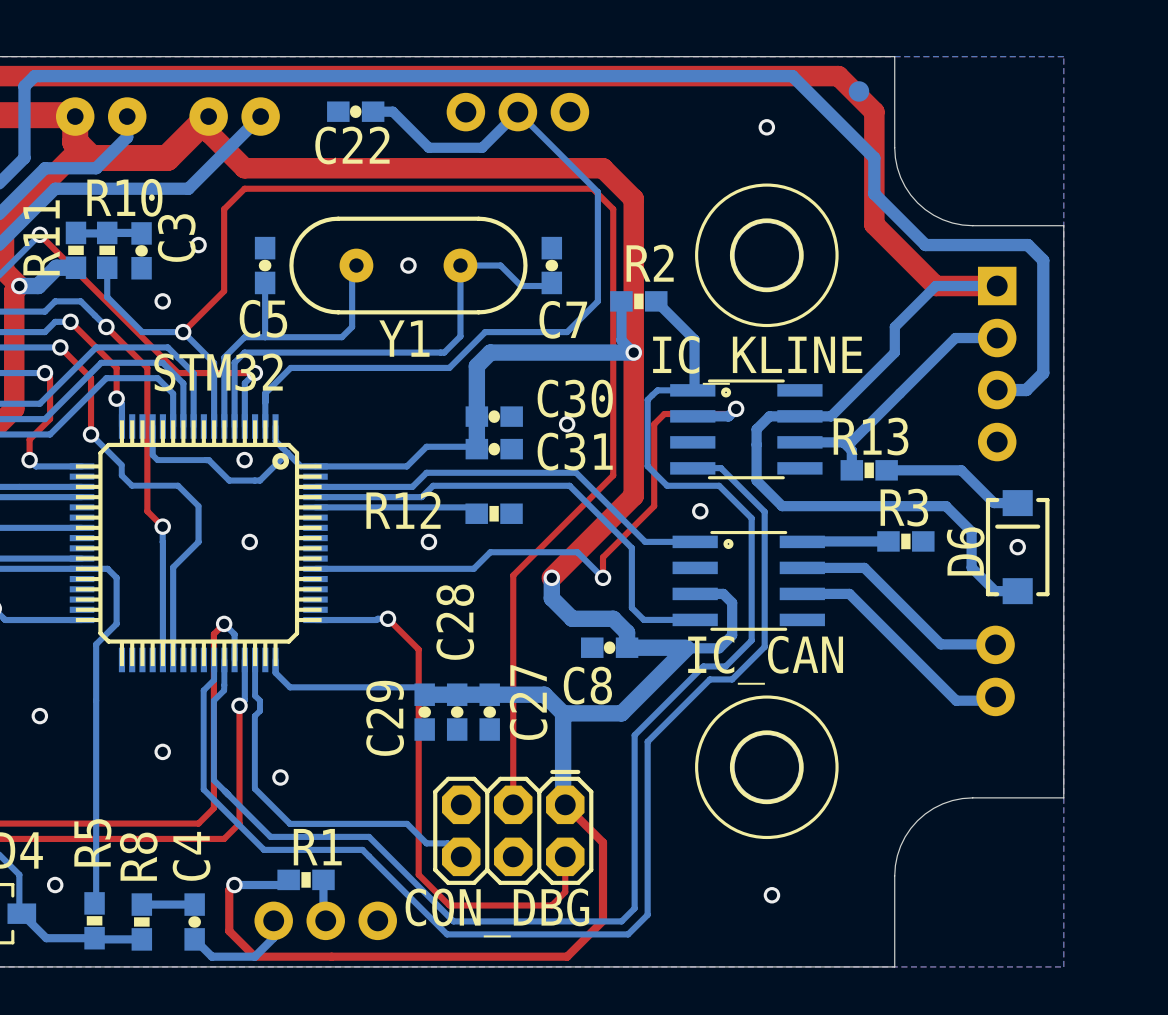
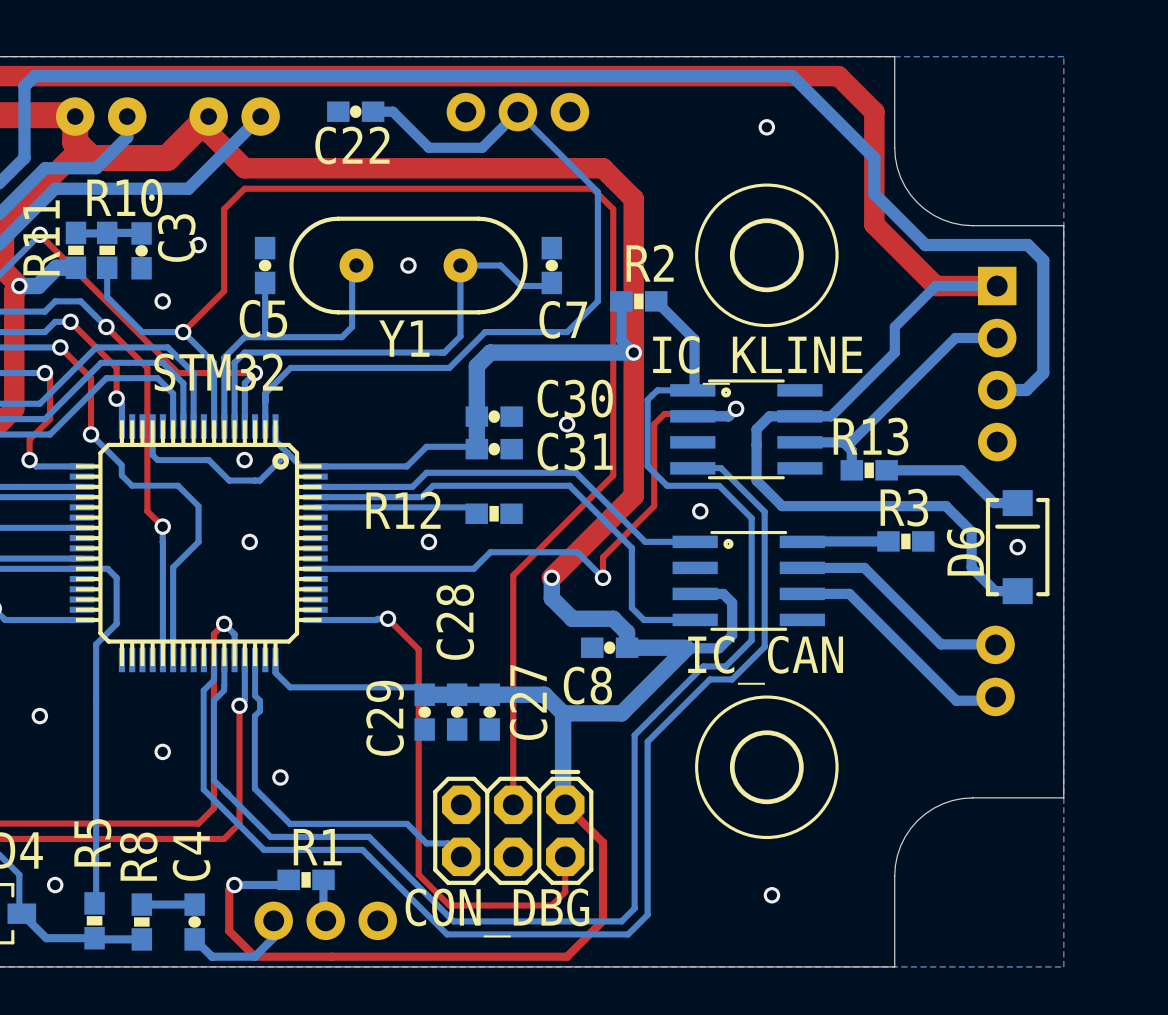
part: (858, 91) -> none

